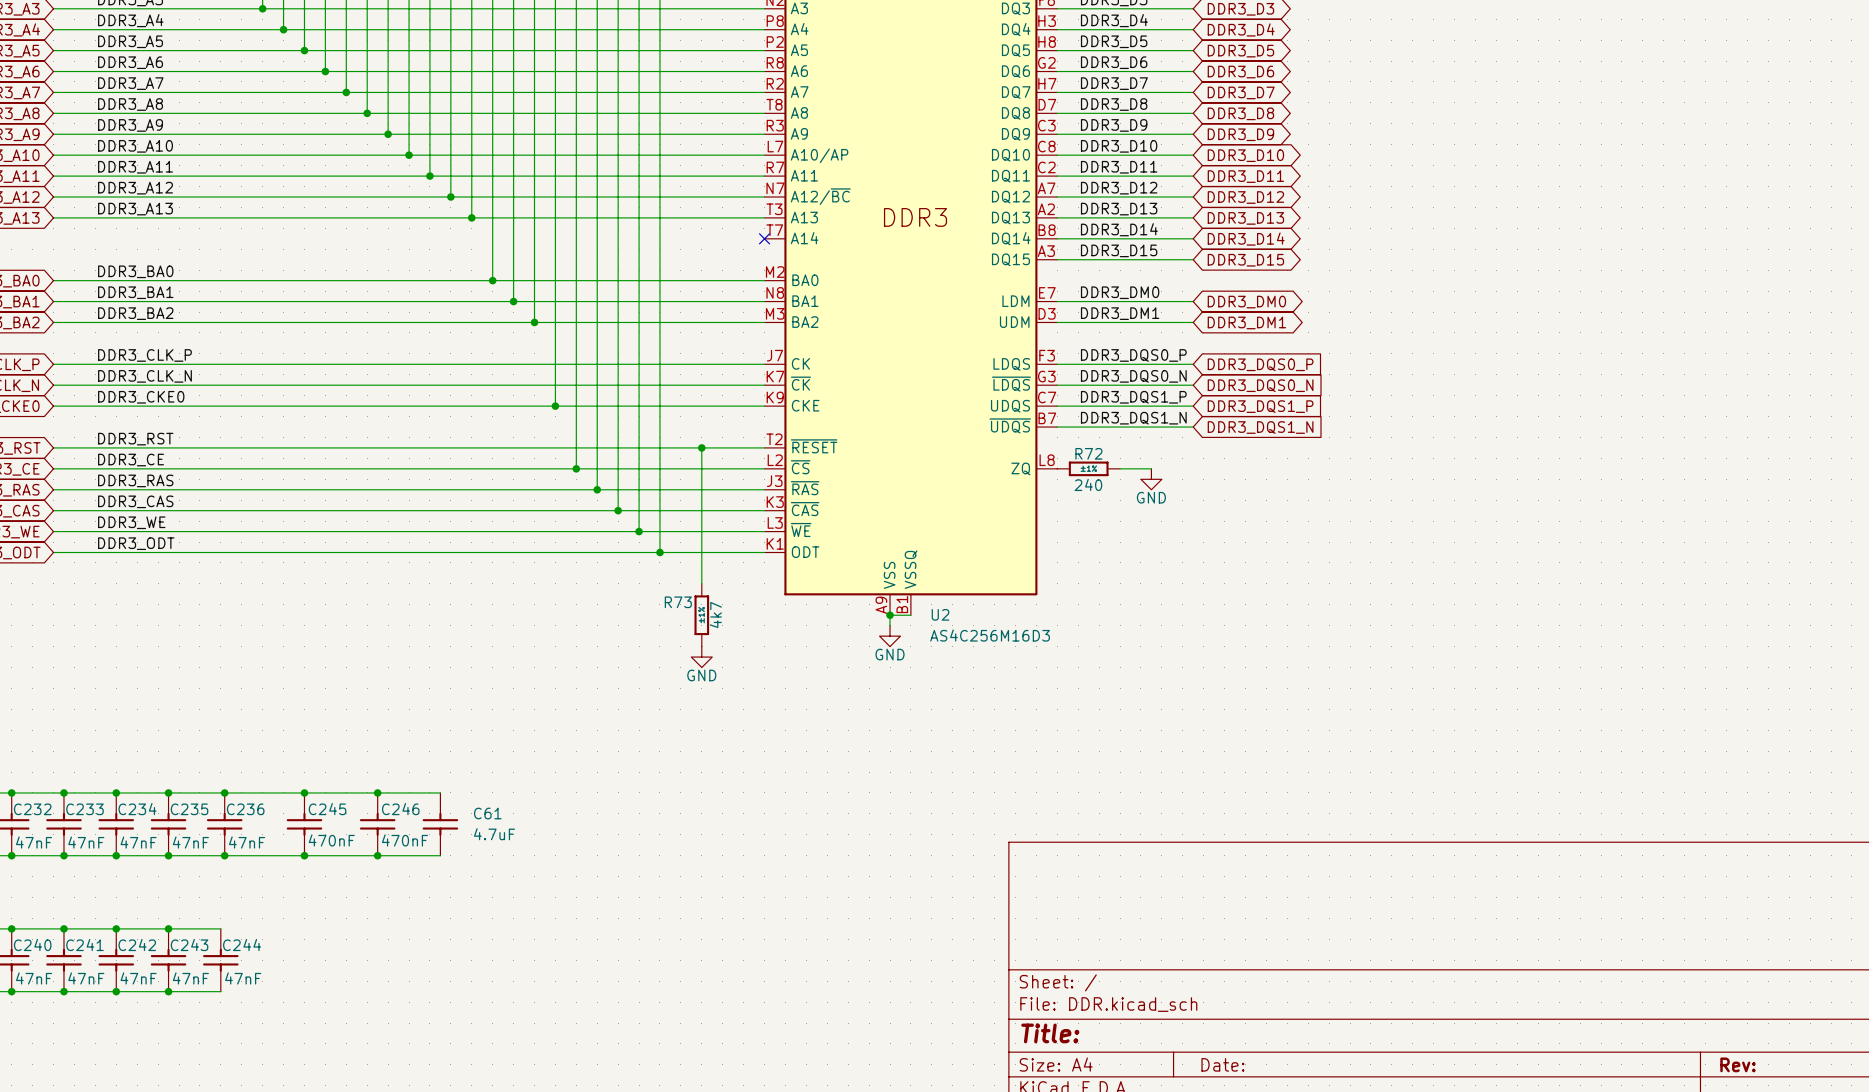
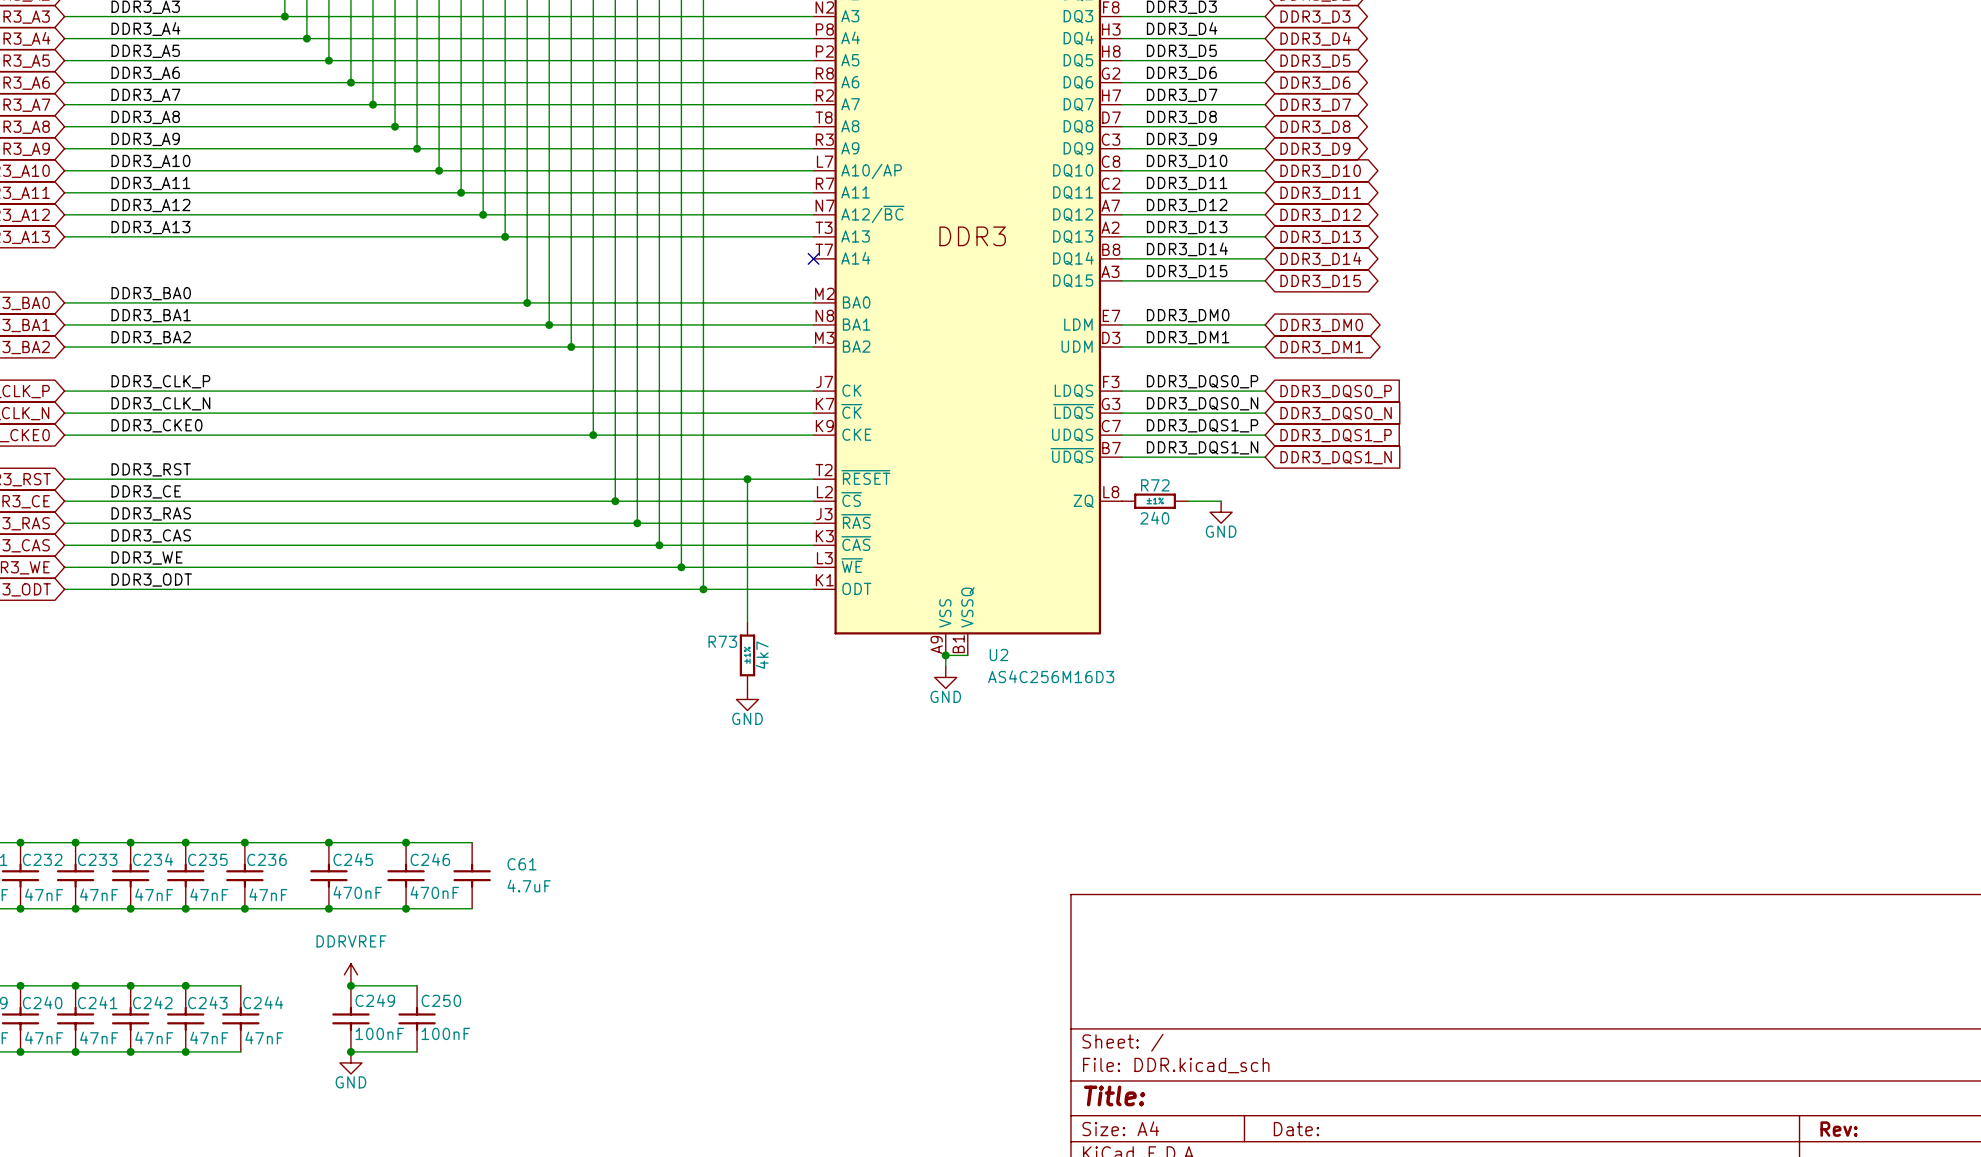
power symbol: none -> DDRVREF (350, 974)
wire: none -> (350, 985) (417, 985)
junction: none -> (350, 985)
C249: none -> (350, 1018)
C250: none -> (417, 1018)
wire: none -> (350, 1051) (417, 1051)
junction: none -> (350, 1051)
power symbol: none -> GND (350, 1062)

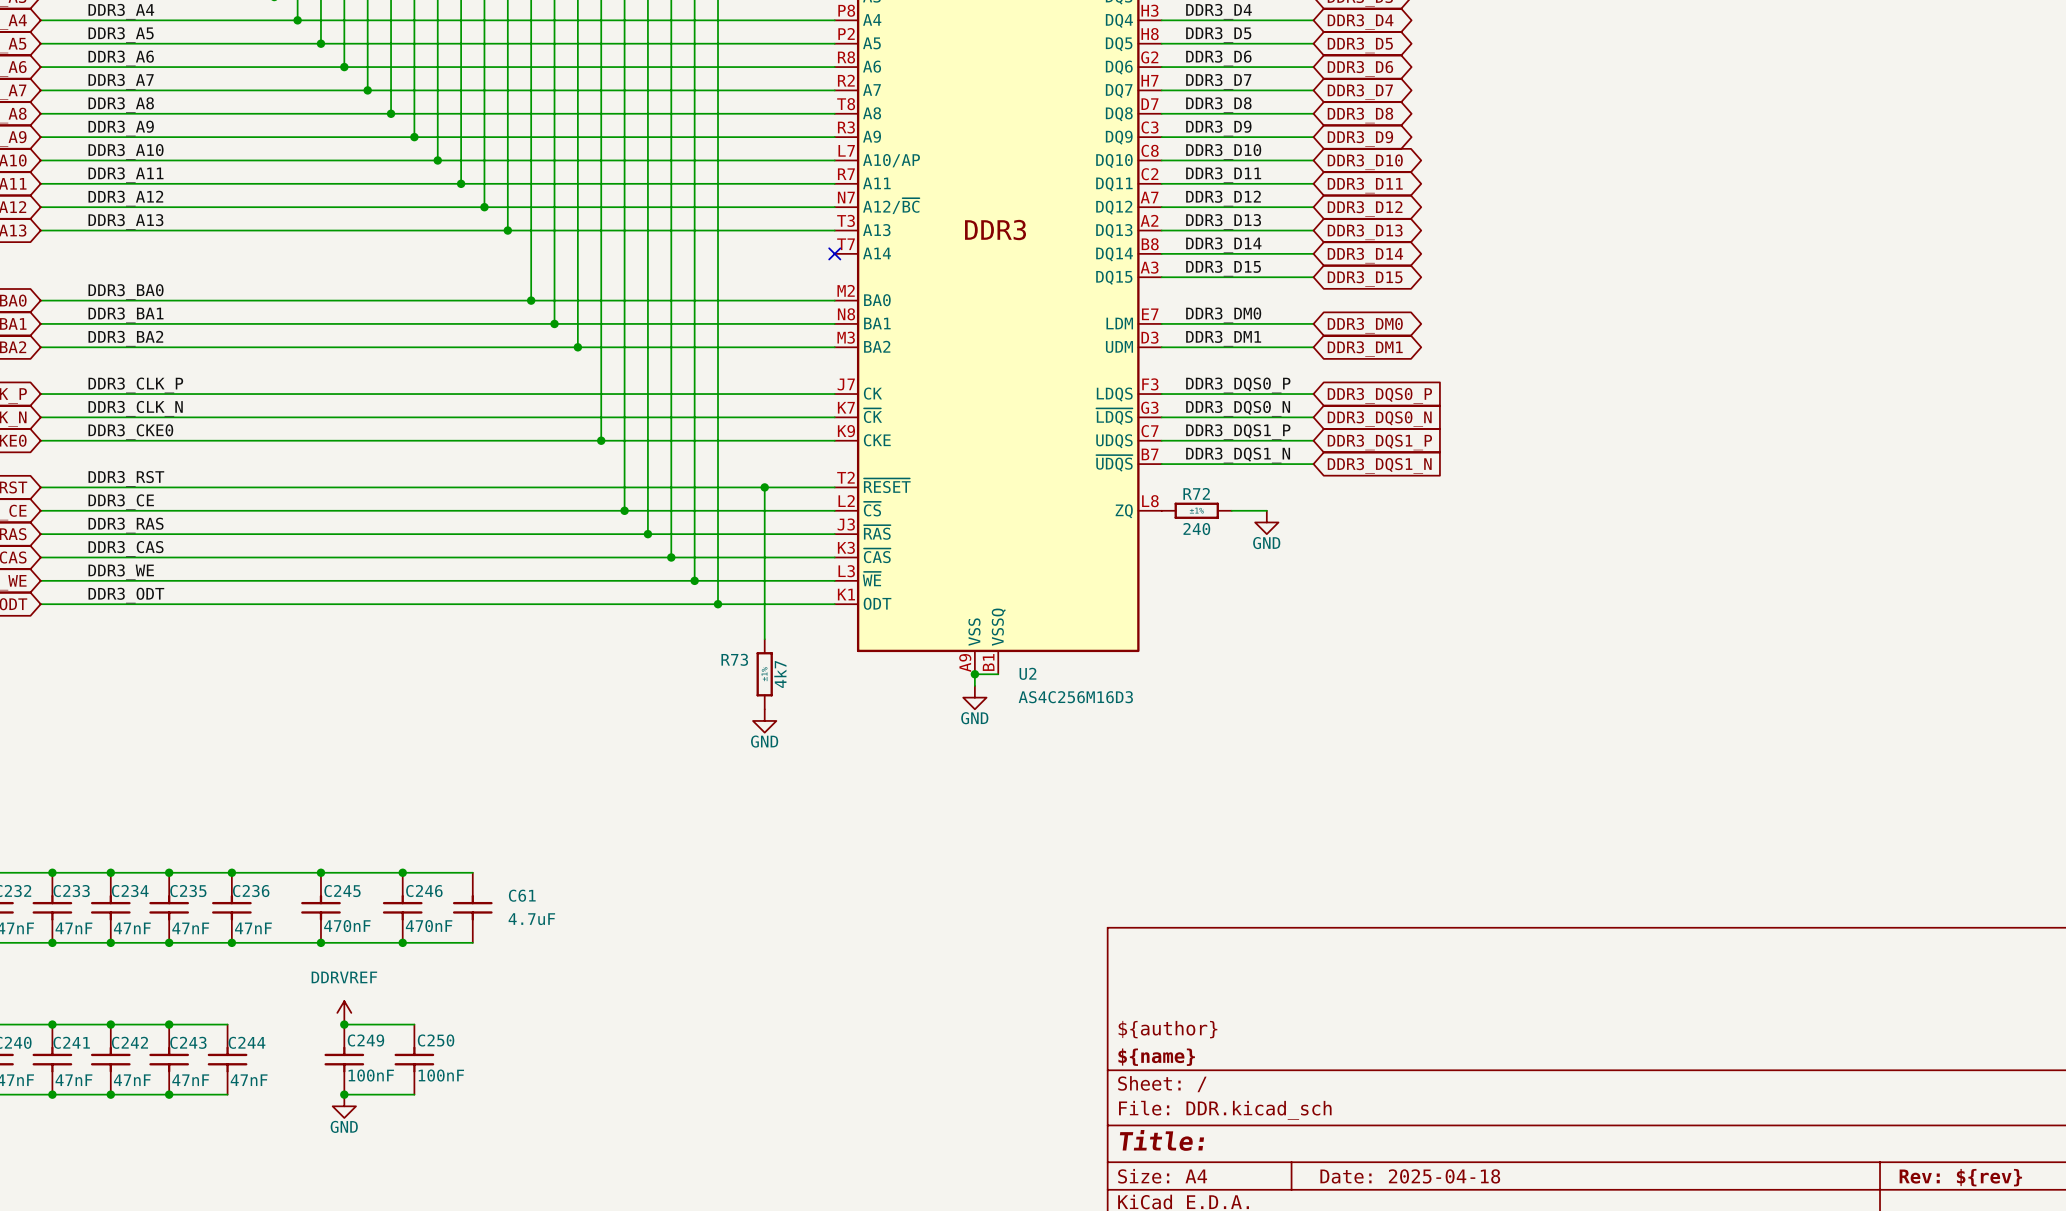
title block: none -> ${author} (1167, 1029)
title block: none -> ${name} (1156, 1057)
title block: Date: (1296, 1129) -> Date: 2025-04-18 (1410, 1176)
title block: Rev: (1839, 1129) -> Rev: ${rev} (1960, 1177)

